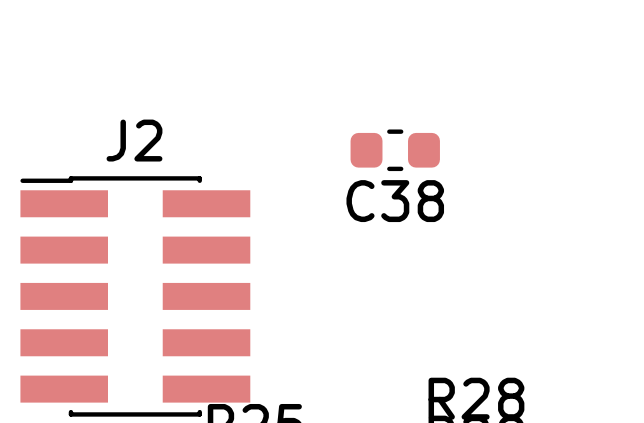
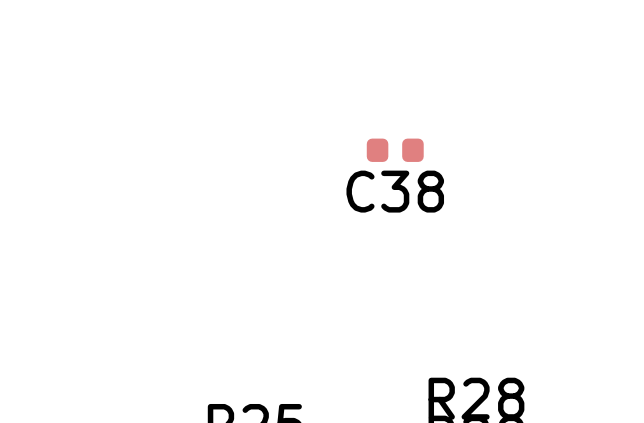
C38 footprint: [350, 129, 440, 172] -> [366, 138, 424, 162]
J2: (135, 296) -> none

